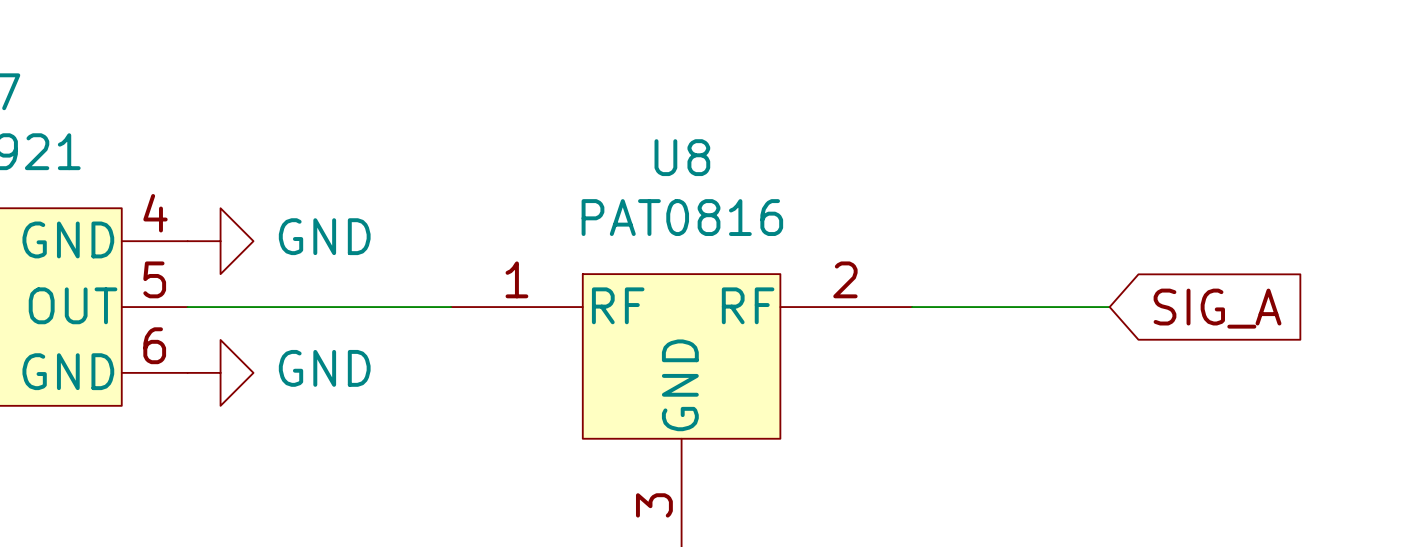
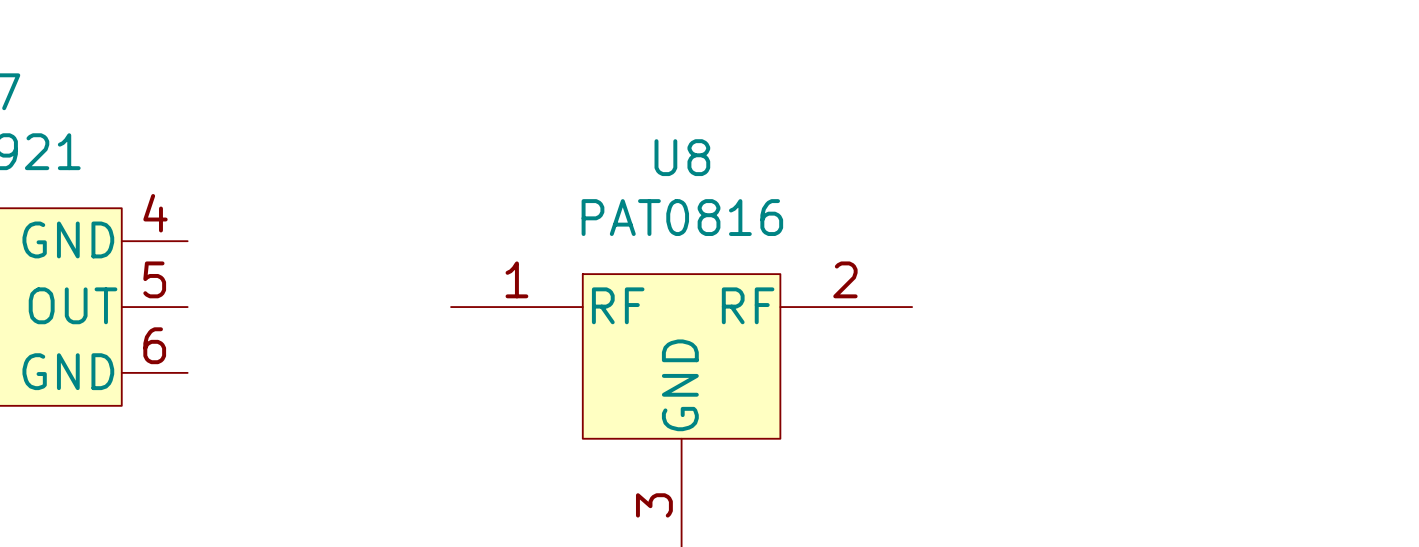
power symbol: GND (220, 241) -> none
wire: (187, 307) (451, 307) -> none
wire: (912, 307) (1109, 307) -> none
global label: SIG_A (1217, 308) -> none
power symbol: GND (220, 372) -> none

